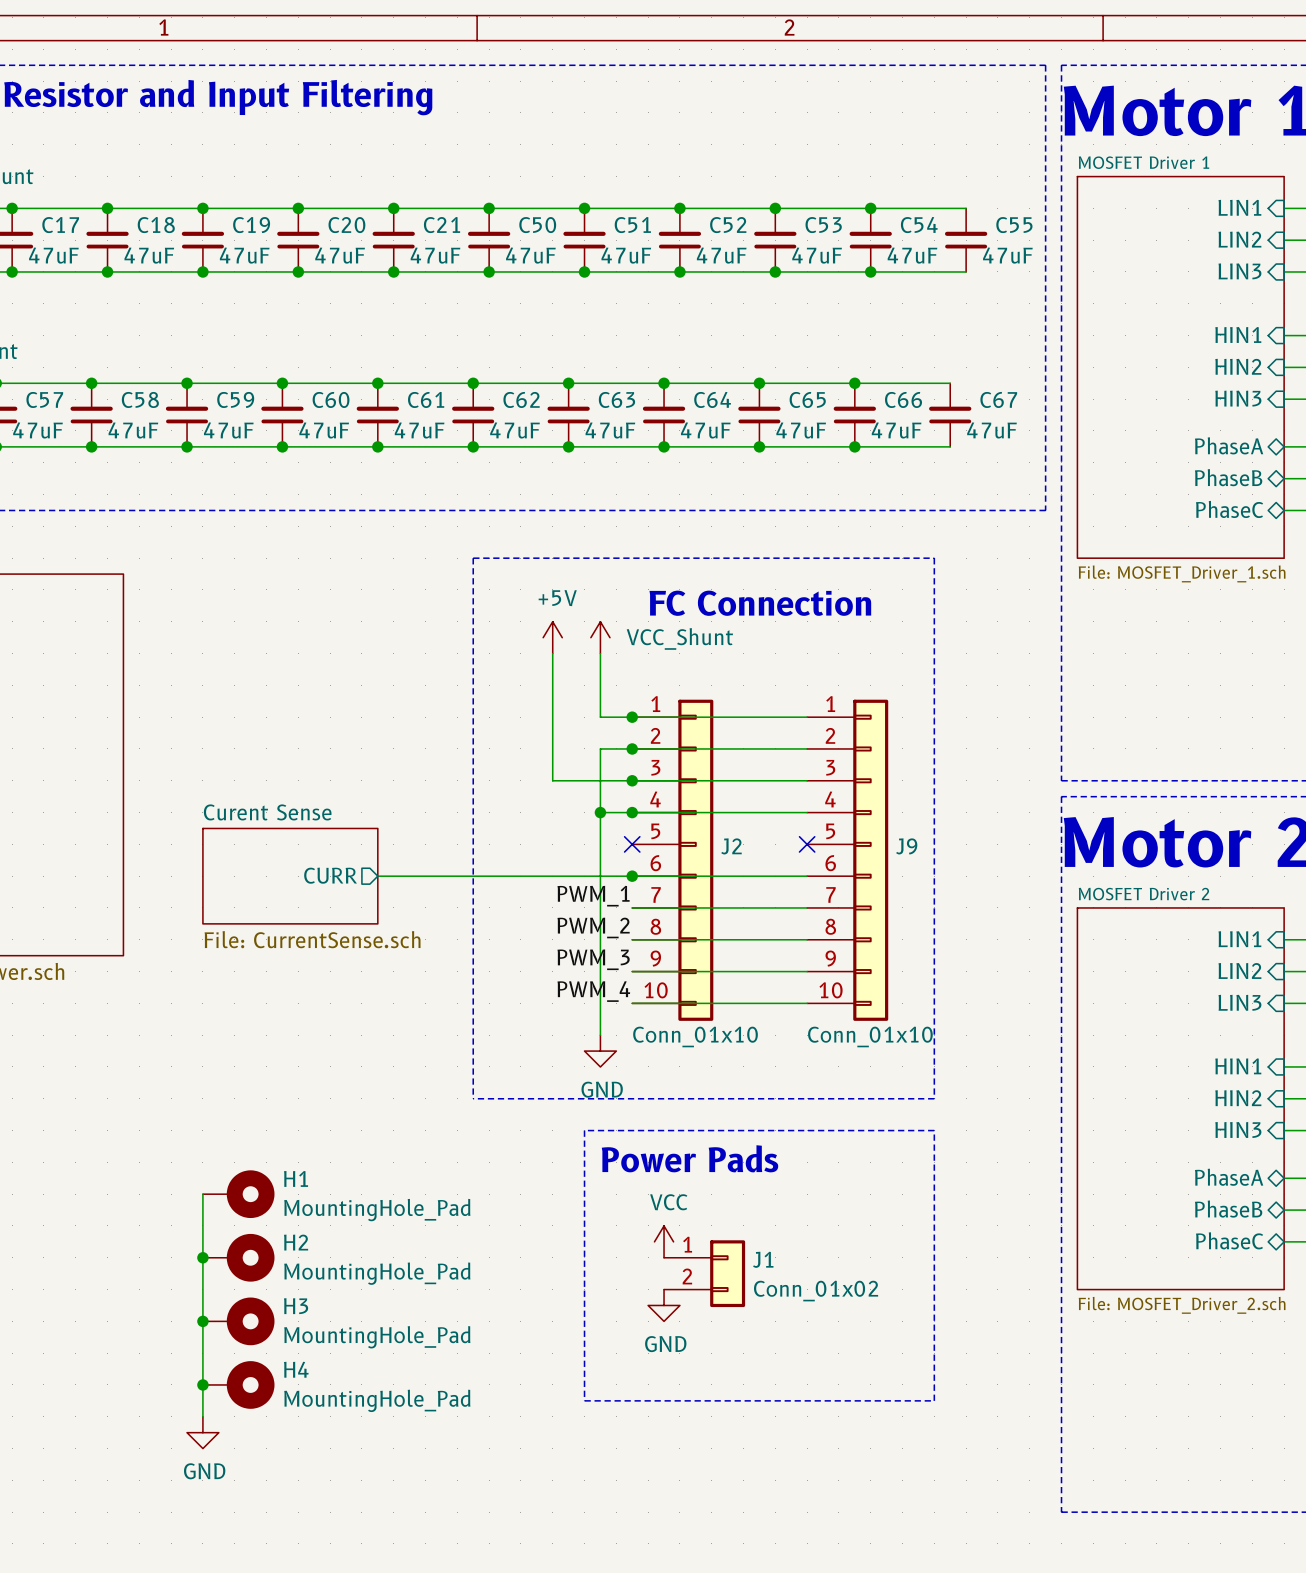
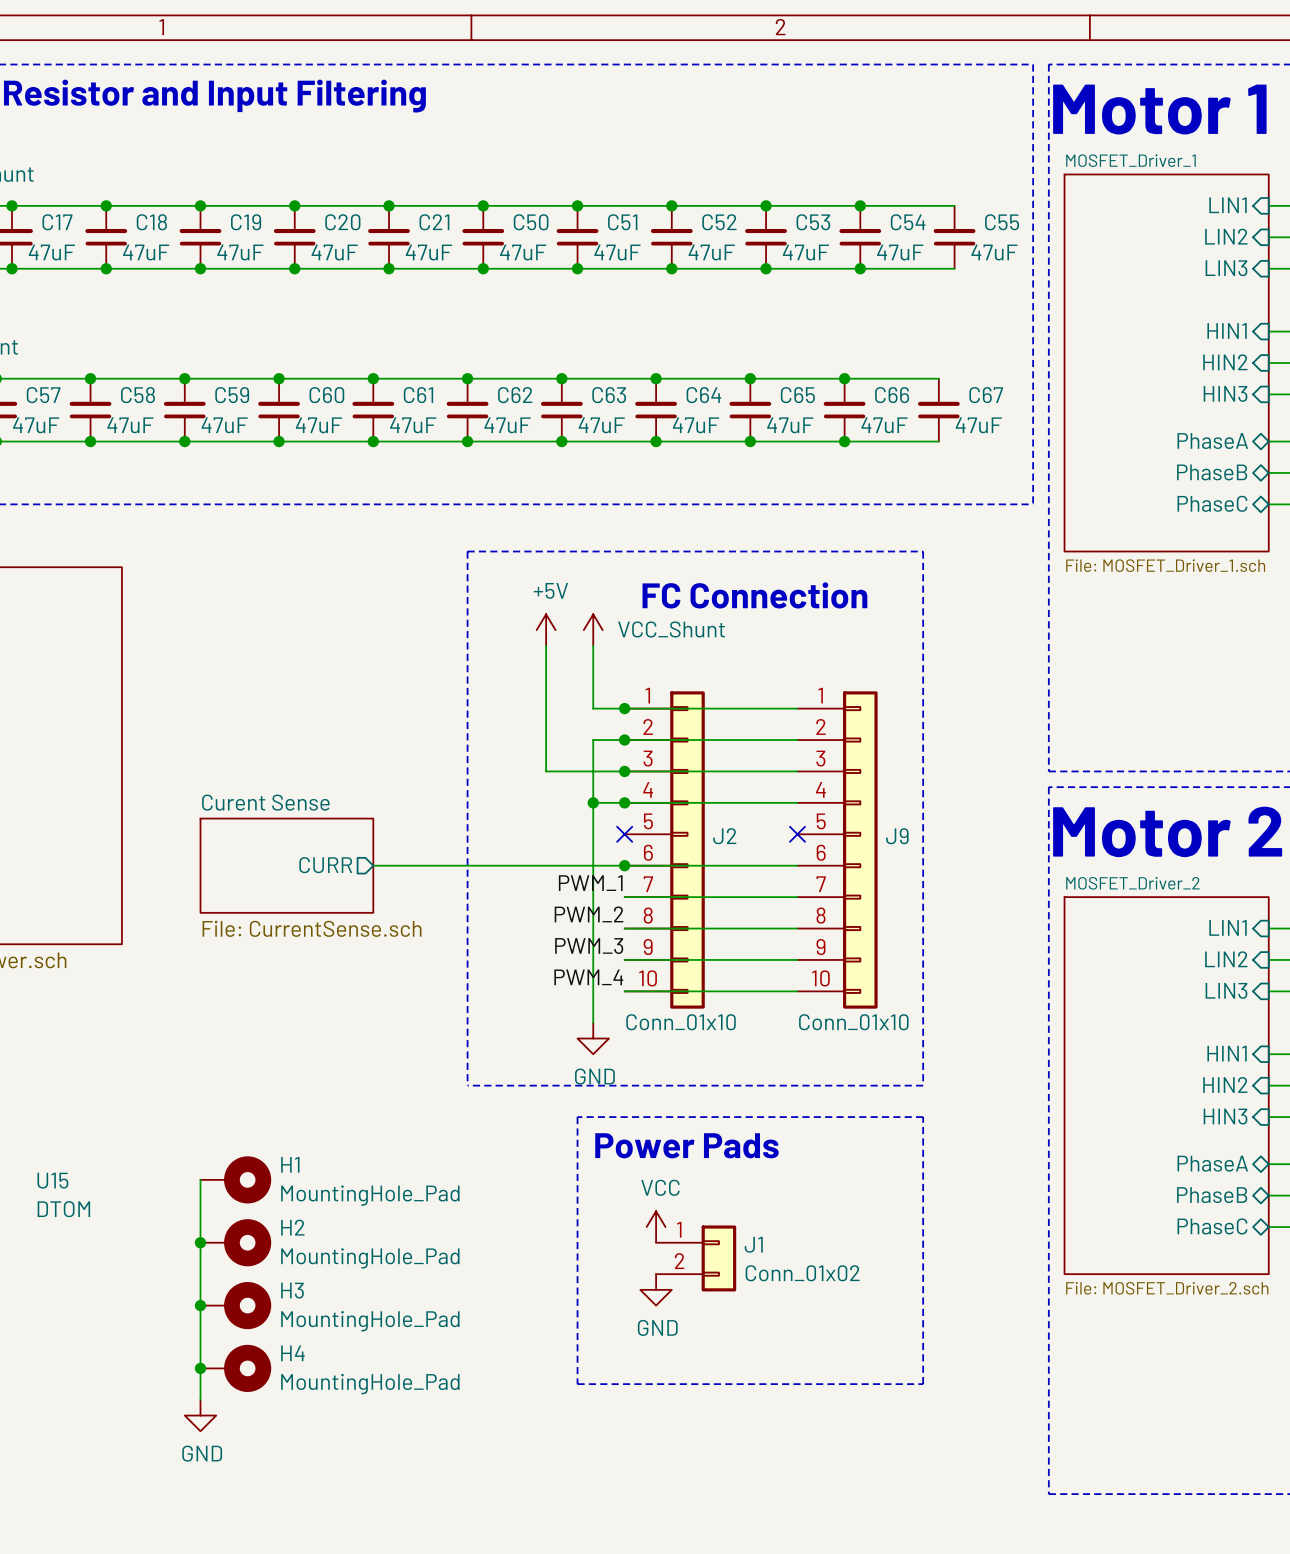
sheet MOSFET Driver 1 name: MOSFET Driver 1 (1144, 162) -> MOSFET_Driver_1 (1130, 160)
sheet MOSFET Driver 2 name: MOSFET Driver 2 (1144, 894) -> MOSFET_Driver_2 (1132, 883)
U15: none -> DTOM (63, 1194)

